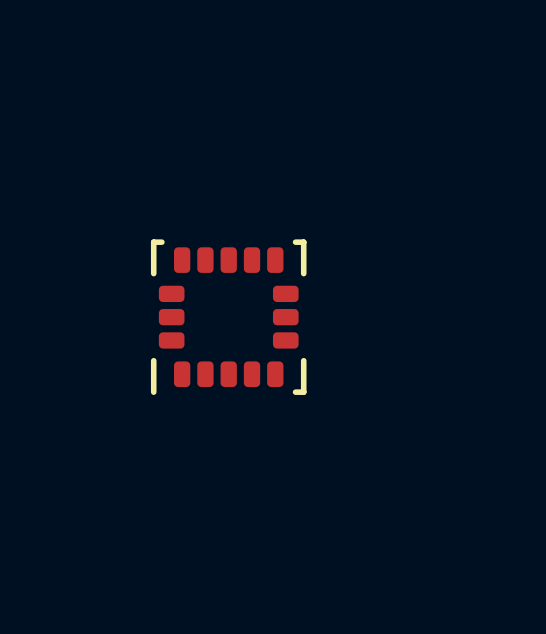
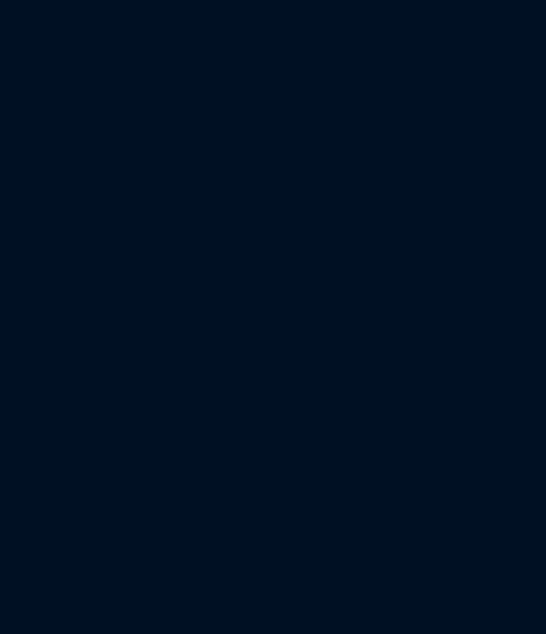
part: (228, 317) -> none

